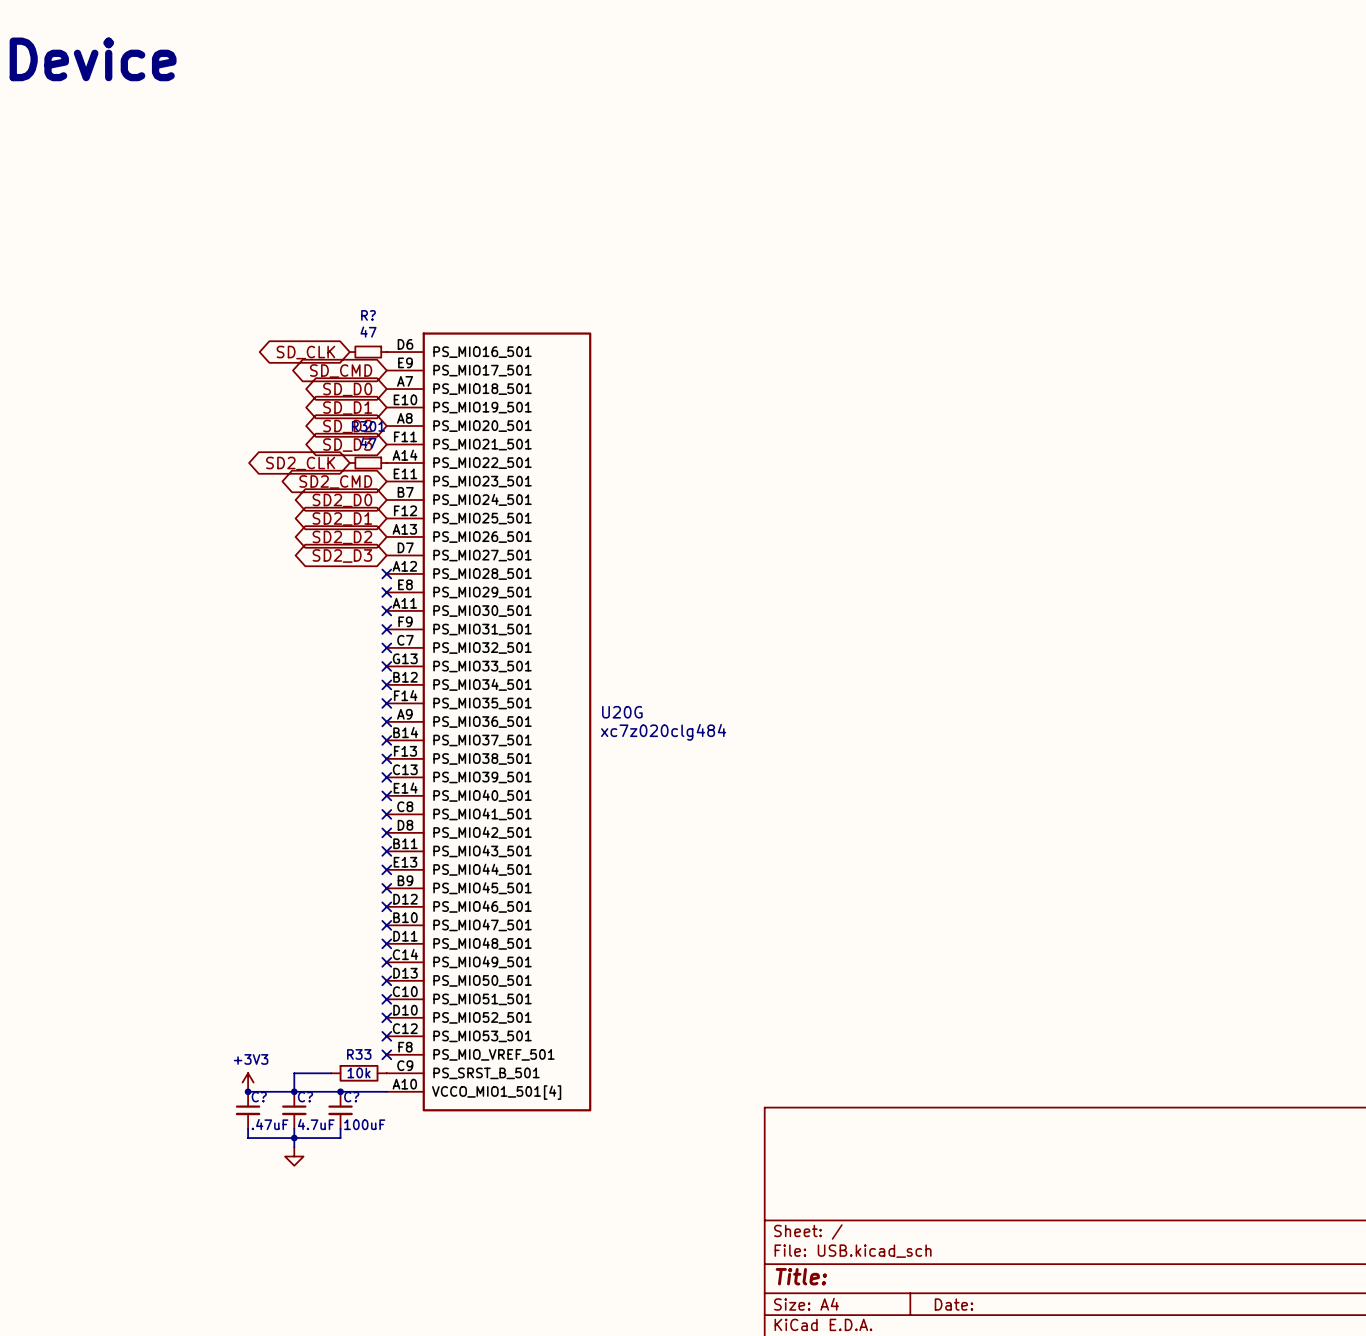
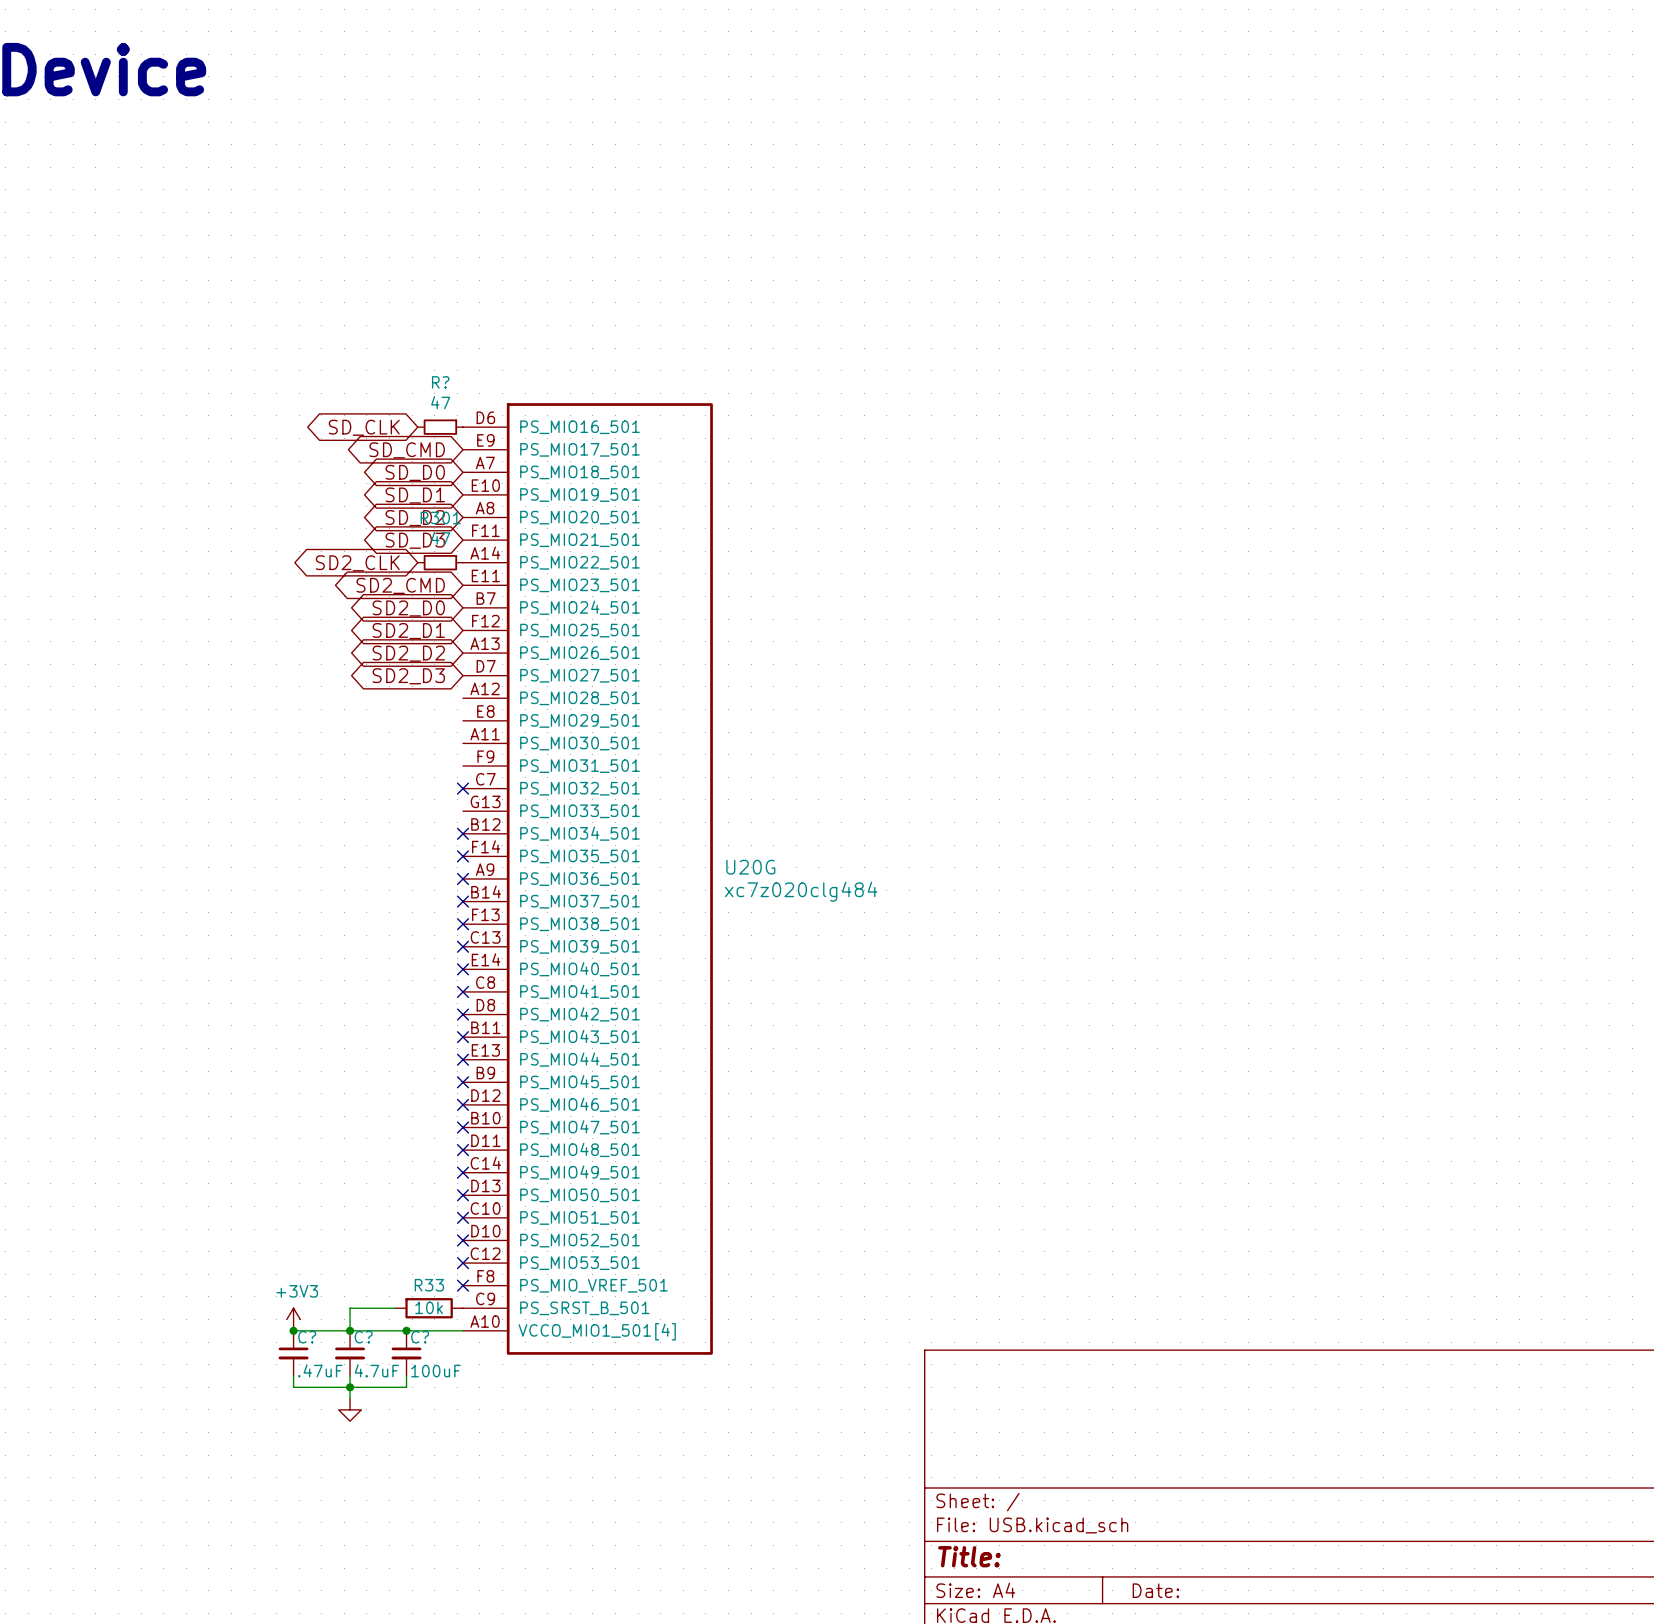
no-connect mark: (386, 573) -> none
no-connect mark: (386, 592) -> none
no-connect mark: (386, 610) -> none
no-connect mark: (386, 629) -> none
no-connect mark: (386, 666) -> none

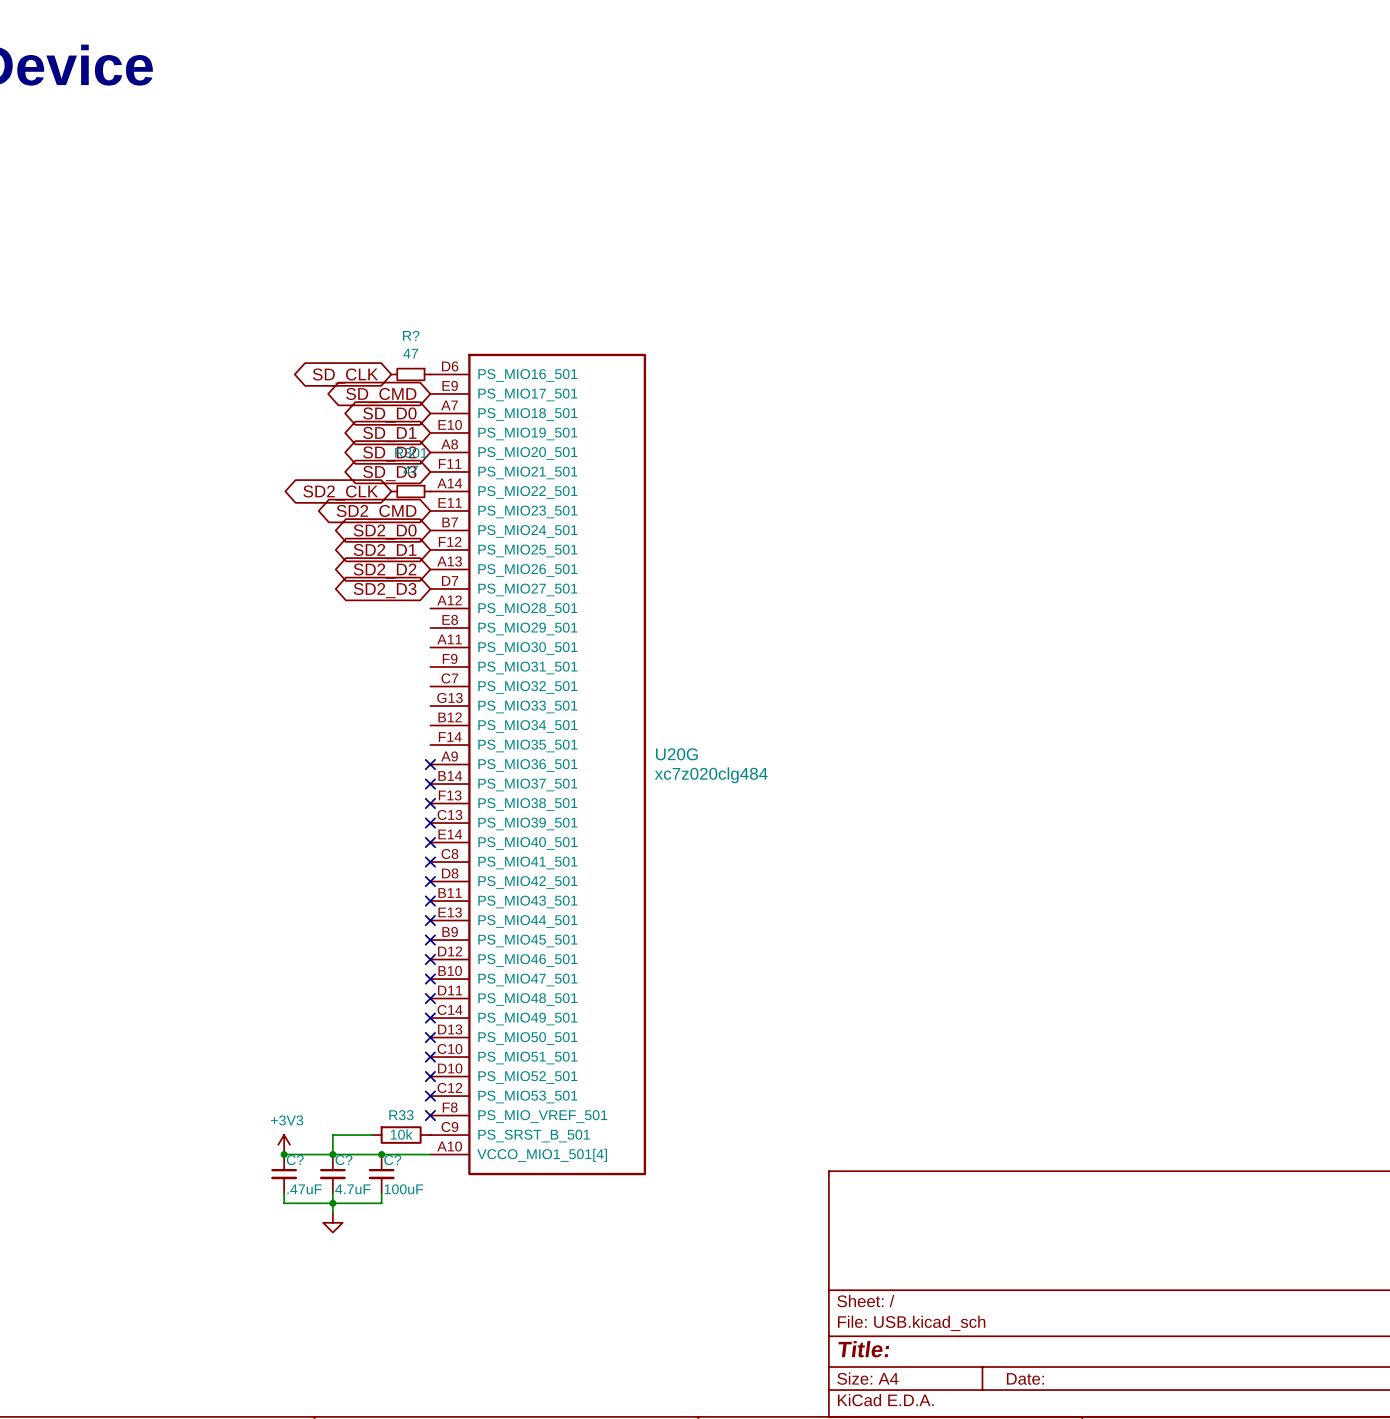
no-connect mark: (463, 788) -> none
no-connect mark: (463, 833) -> none
no-connect mark: (463, 856) -> none

